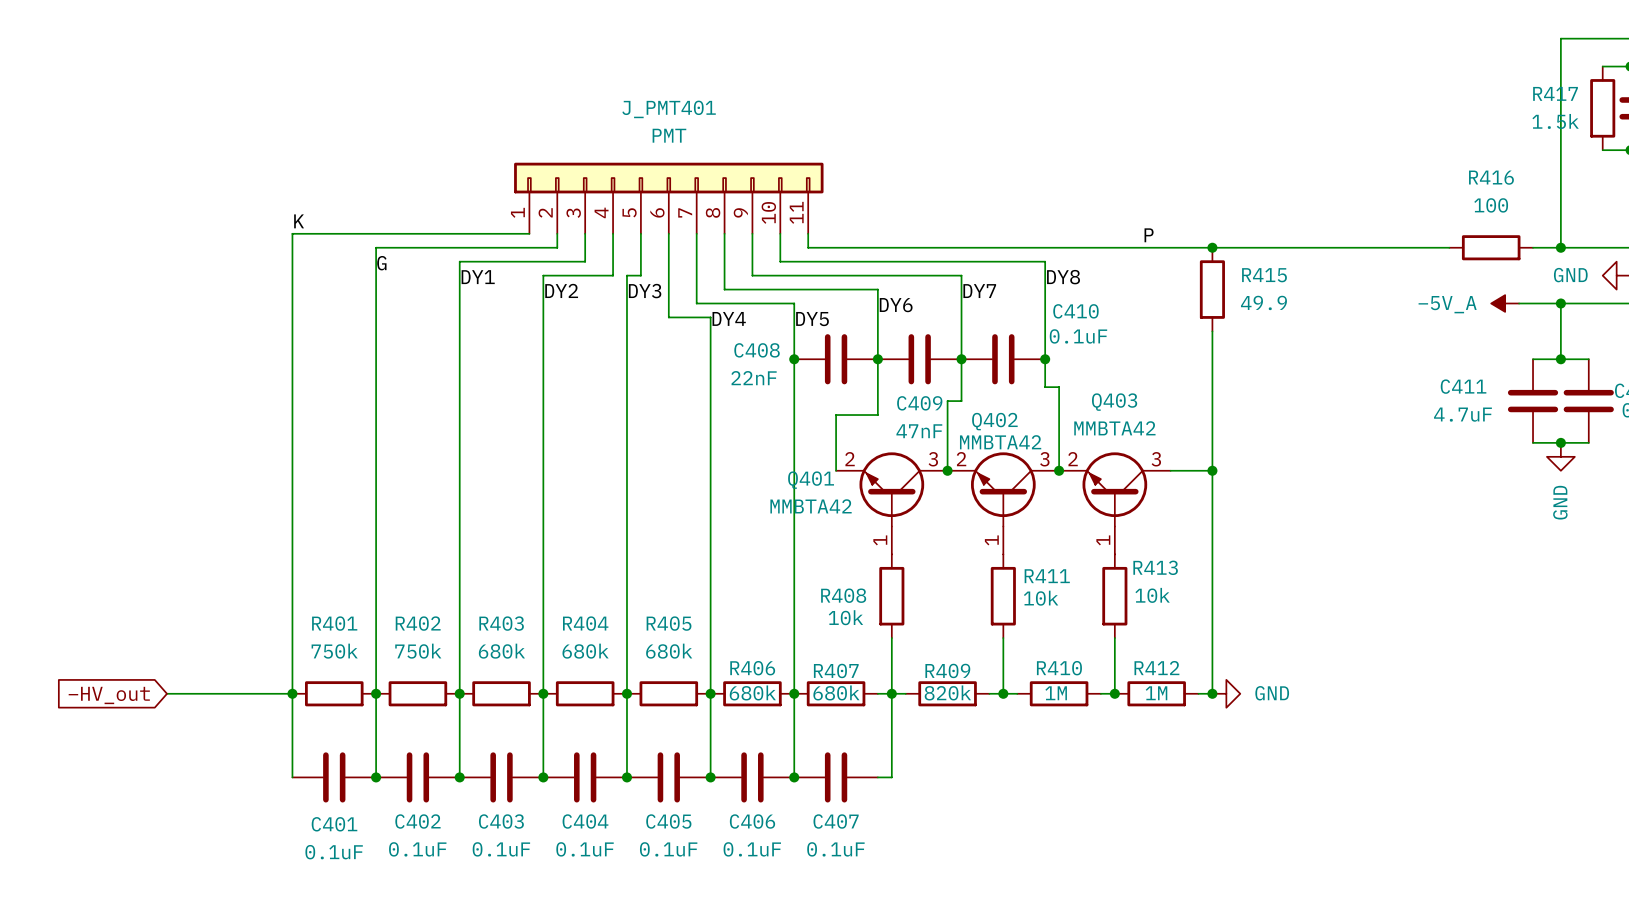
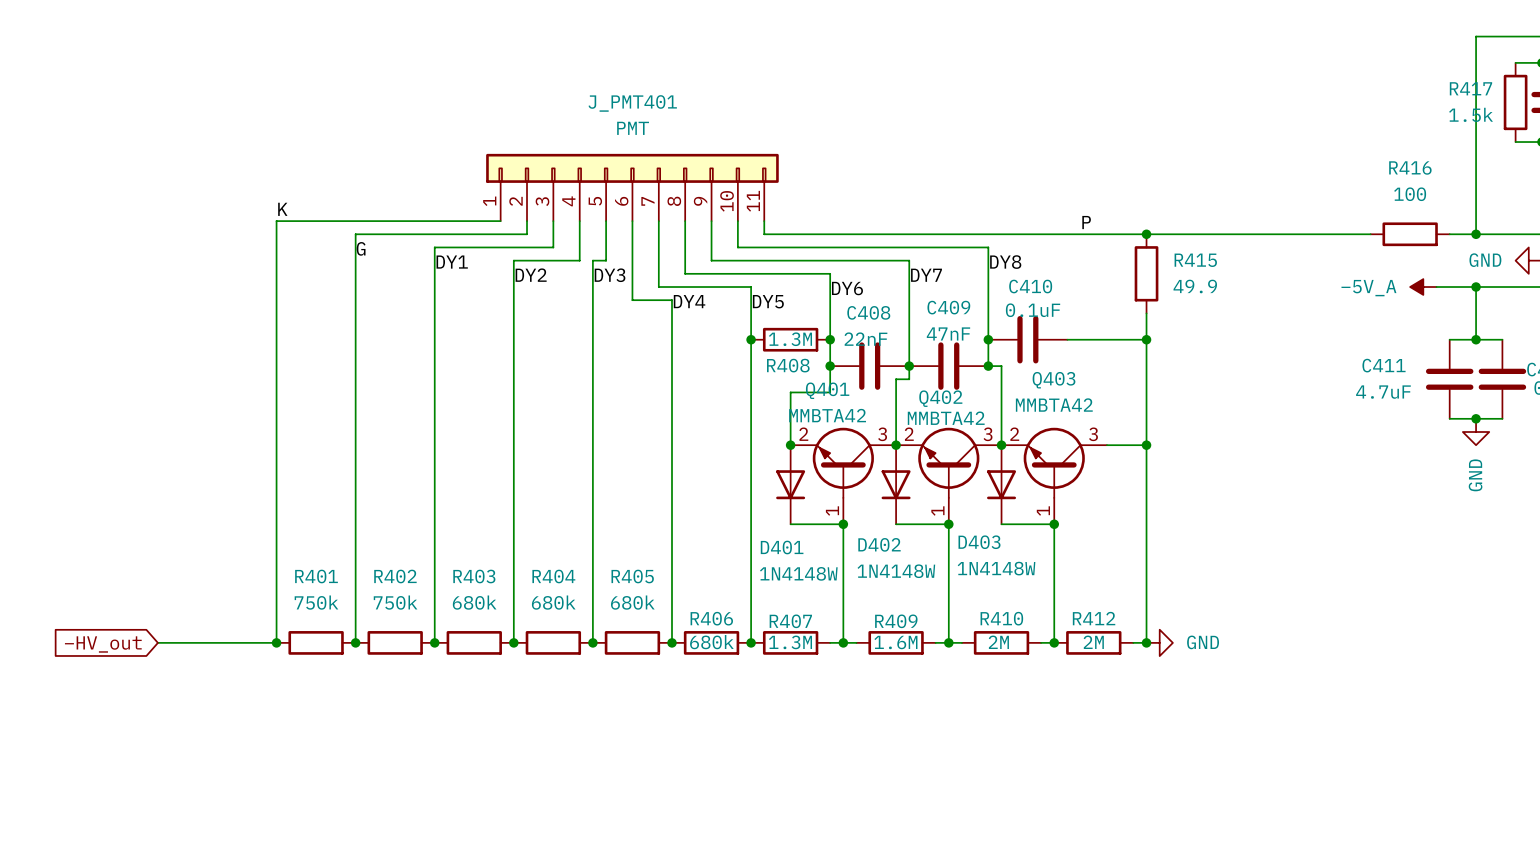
C410 name position: C410 (1075, 311) -> C410 (1030, 286)
C410 value position: 0.1uF (1078, 336) -> 0.1uF (1033, 310)
C408 name position: C408 (757, 350) -> C408 (868, 312)
C408 position: (836, 359) -> (869, 366)
C409 position: (919, 359) -> (948, 366)
junction position: (961, 359) -> (909, 366)
C410 position: (1003, 359) -> (1027, 339)
wire: none -> (1067, 339) (1146, 339)
junction: none -> (1146, 339)
C408 value position: 22nF (754, 378) -> 22nF (865, 339)
junction: none -> (830, 366)
junction: none -> (988, 366)
C409 name position: C409 (919, 403) -> C409 (948, 307)
C409 value position: 47nF (919, 431) -> 47nF (948, 333)
junction: none -> (790, 445)
Q401 name position: Q401 (811, 480) -> Q401 (827, 390)
Q401 value position: MMBTA42 (811, 506) -> MMBTA42 (827, 415)
D401: none -> 1N4148W (790, 484)
D402: none -> 1N4148W (896, 484)
D403: none -> 1N4148W (1001, 484)
wire: none -> (790, 524) (843, 524) (843, 603)
junction: none -> (843, 524)
wire: none -> (896, 524) (948, 524) (948, 603)
junction: none -> (948, 524)
wire: none -> (1001, 524) (1054, 524) (1054, 603)
junction: none -> (1054, 524)
R408 name position: R408 (843, 595) -> R408 (788, 365)
R408 rotation: 0° (891, 596) -> 90° clockwise (790, 339)
R408 position: (891, 596) -> (790, 339)
R411: 10k (1003, 596) -> none
R413: 10k (1114, 596) -> none
R408 value: 10k (845, 617) -> 1.3M (790, 339)
wire: (292, 679) (292, 777) -> (276, 642) (157, 642)
wire: (376, 679) (376, 777) -> none
wire: (459, 679) (459, 777) -> none
wire: (543, 679) (543, 777) -> none
wire: (626, 679) (626, 777) -> none
wire: (710, 679) (710, 777) -> none
wire: (794, 679) (794, 777) -> none
wire: (891, 679) (891, 777) (877, 777) -> none
wire: (1003, 679) (1003, 693) -> none
wire: (1114, 679) (1114, 693) (1100, 693) -> (1054, 642) (1041, 642)
wire: (1212, 679) (1212, 693) (1198, 693) -> (1146, 642) (1133, 642)
R407 value: 680k (836, 692) -> 1.3M (790, 642)
R409 value: 820k (947, 692) -> 1.6M (895, 642)
wire: (167, 693) (292, 693) -> none
junction position: (292, 693) -> (276, 642)
R401 position: (334, 693) -> (316, 642)
junction position: (376, 693) -> (355, 642)
R402 position: (417, 693) -> (395, 642)
junction position: (459, 693) -> (434, 642)
R403 position: (501, 693) -> (474, 642)
junction position: (543, 693) -> (513, 642)
R404 position: (585, 693) -> (553, 642)
junction position: (626, 693) -> (592, 642)
R405 position: (668, 693) -> (632, 642)
junction position: (710, 693) -> (671, 642)
R406 position: (752, 693) -> (711, 642)
junction position: (794, 693) -> (751, 642)
R407 position: (836, 693) -> (790, 642)
wire: (877, 693) (905, 693) -> (830, 642) (856, 642)
junction position: (891, 693) -> (843, 642)
R409 position: (947, 693) -> (896, 642)
wire: (989, 693) (1017, 693) -> (935, 642) (961, 642)
junction position: (1003, 693) -> (948, 642)
R410 value: 1M (1056, 693) -> 2M (998, 642)
R410 position: (1059, 693) -> (1001, 642)
junction position: (1114, 693) -> (1054, 642)
R412 position: (1156, 693) -> (1093, 642)
R412 value: 1M (1156, 693) -> 2M (1093, 642)
junction position: (1212, 693) -> (1146, 642)
power symbol position: GND (1226, 693) -> GND (1159, 642)
global label position: −HV_out (109, 695) -> −HV_out (103, 644)
C401: 0.1uF (334, 777) -> none
junction: (376, 777) -> none
C402: 0.1uF (417, 777) -> none
junction: (459, 777) -> none
C403: 0.1uF (501, 777) -> none
junction: (543, 777) -> none
C404: 0.1uF (585, 777) -> none
junction: (626, 777) -> none
C405: 0.1uF (668, 777) -> none
junction: (710, 777) -> none
C406: 0.1uF (752, 777) -> none
junction: (794, 777) -> none
C407: 0.1uF (836, 777) -> none

